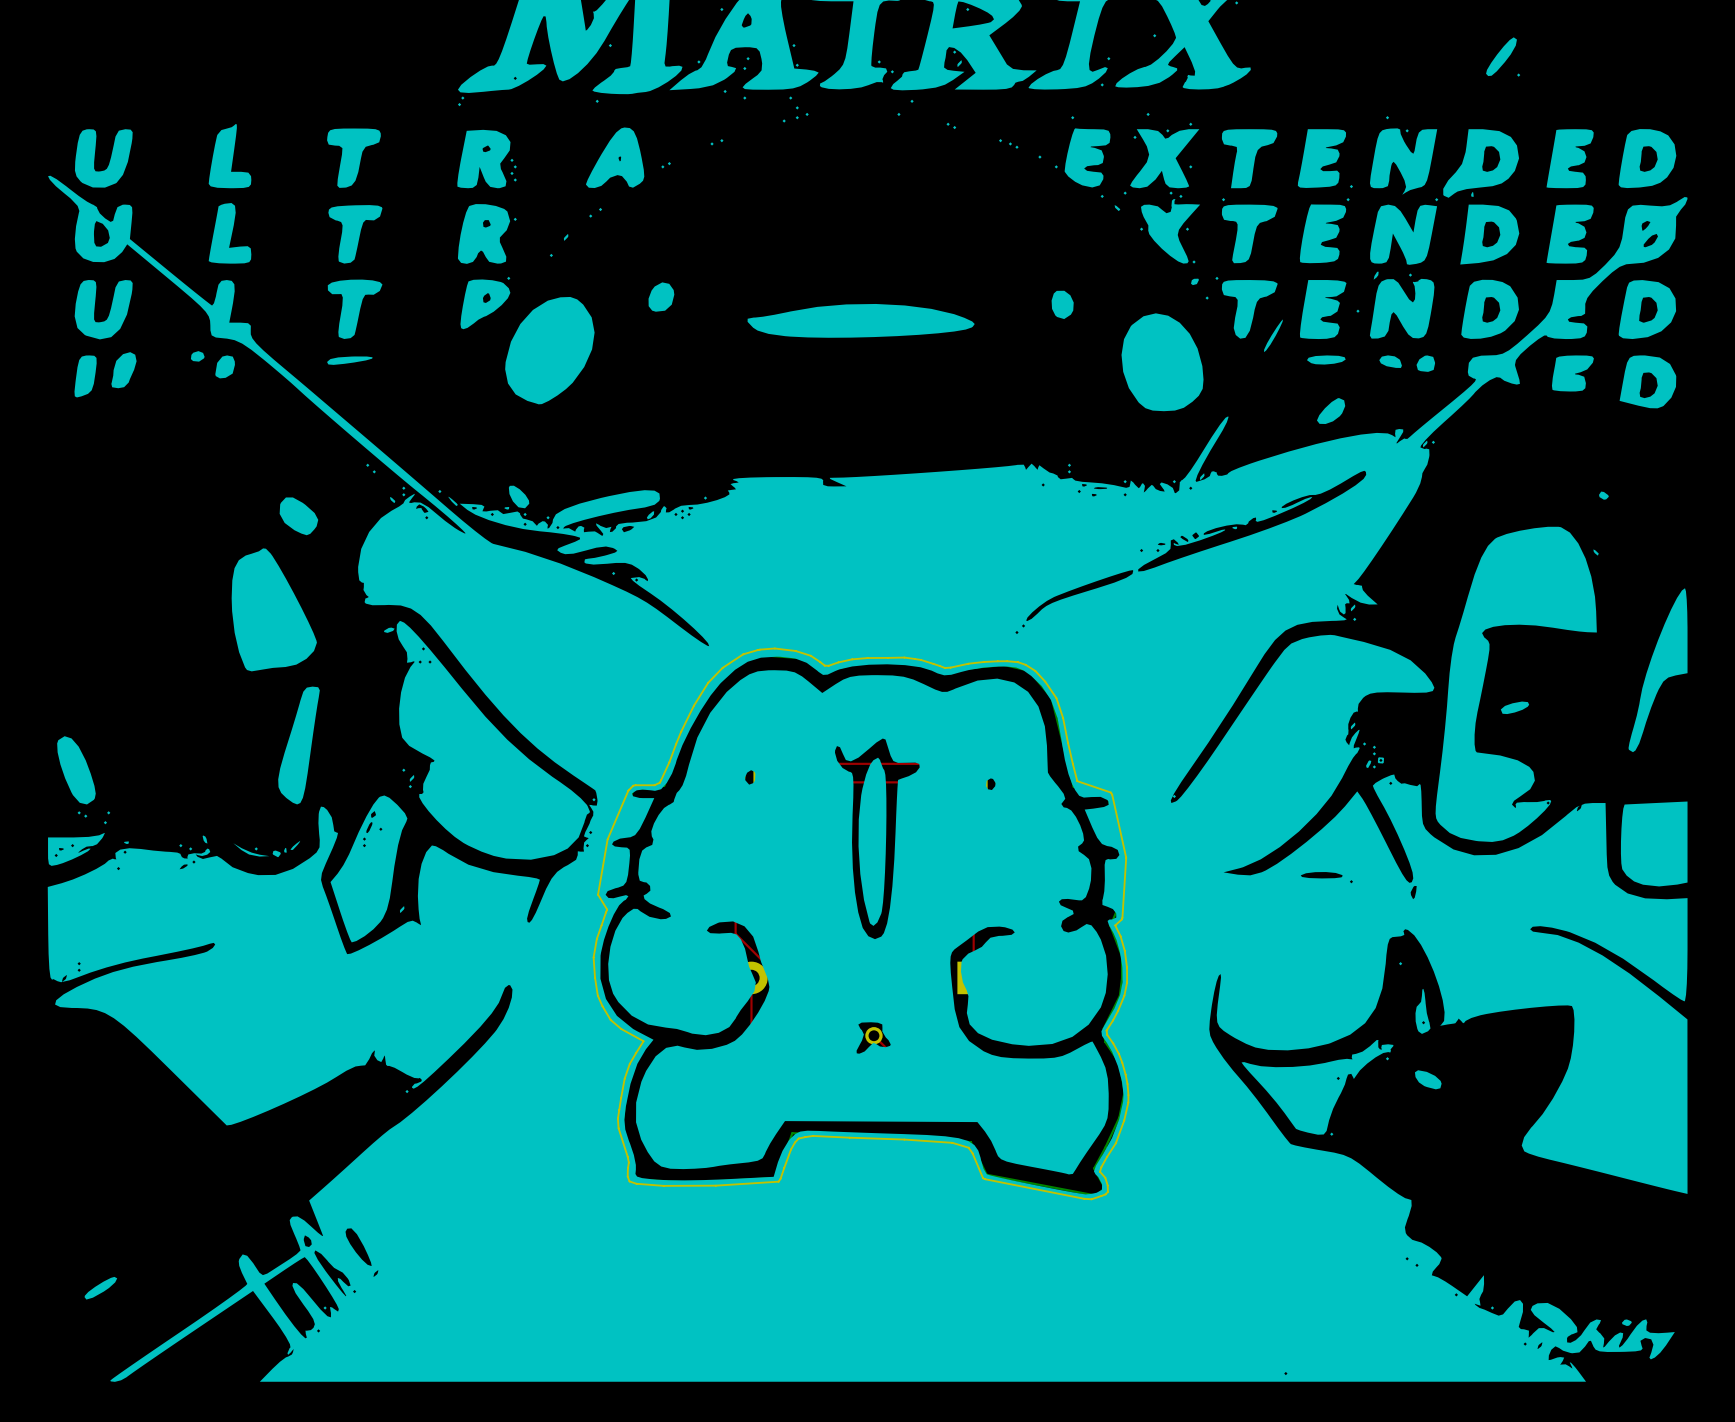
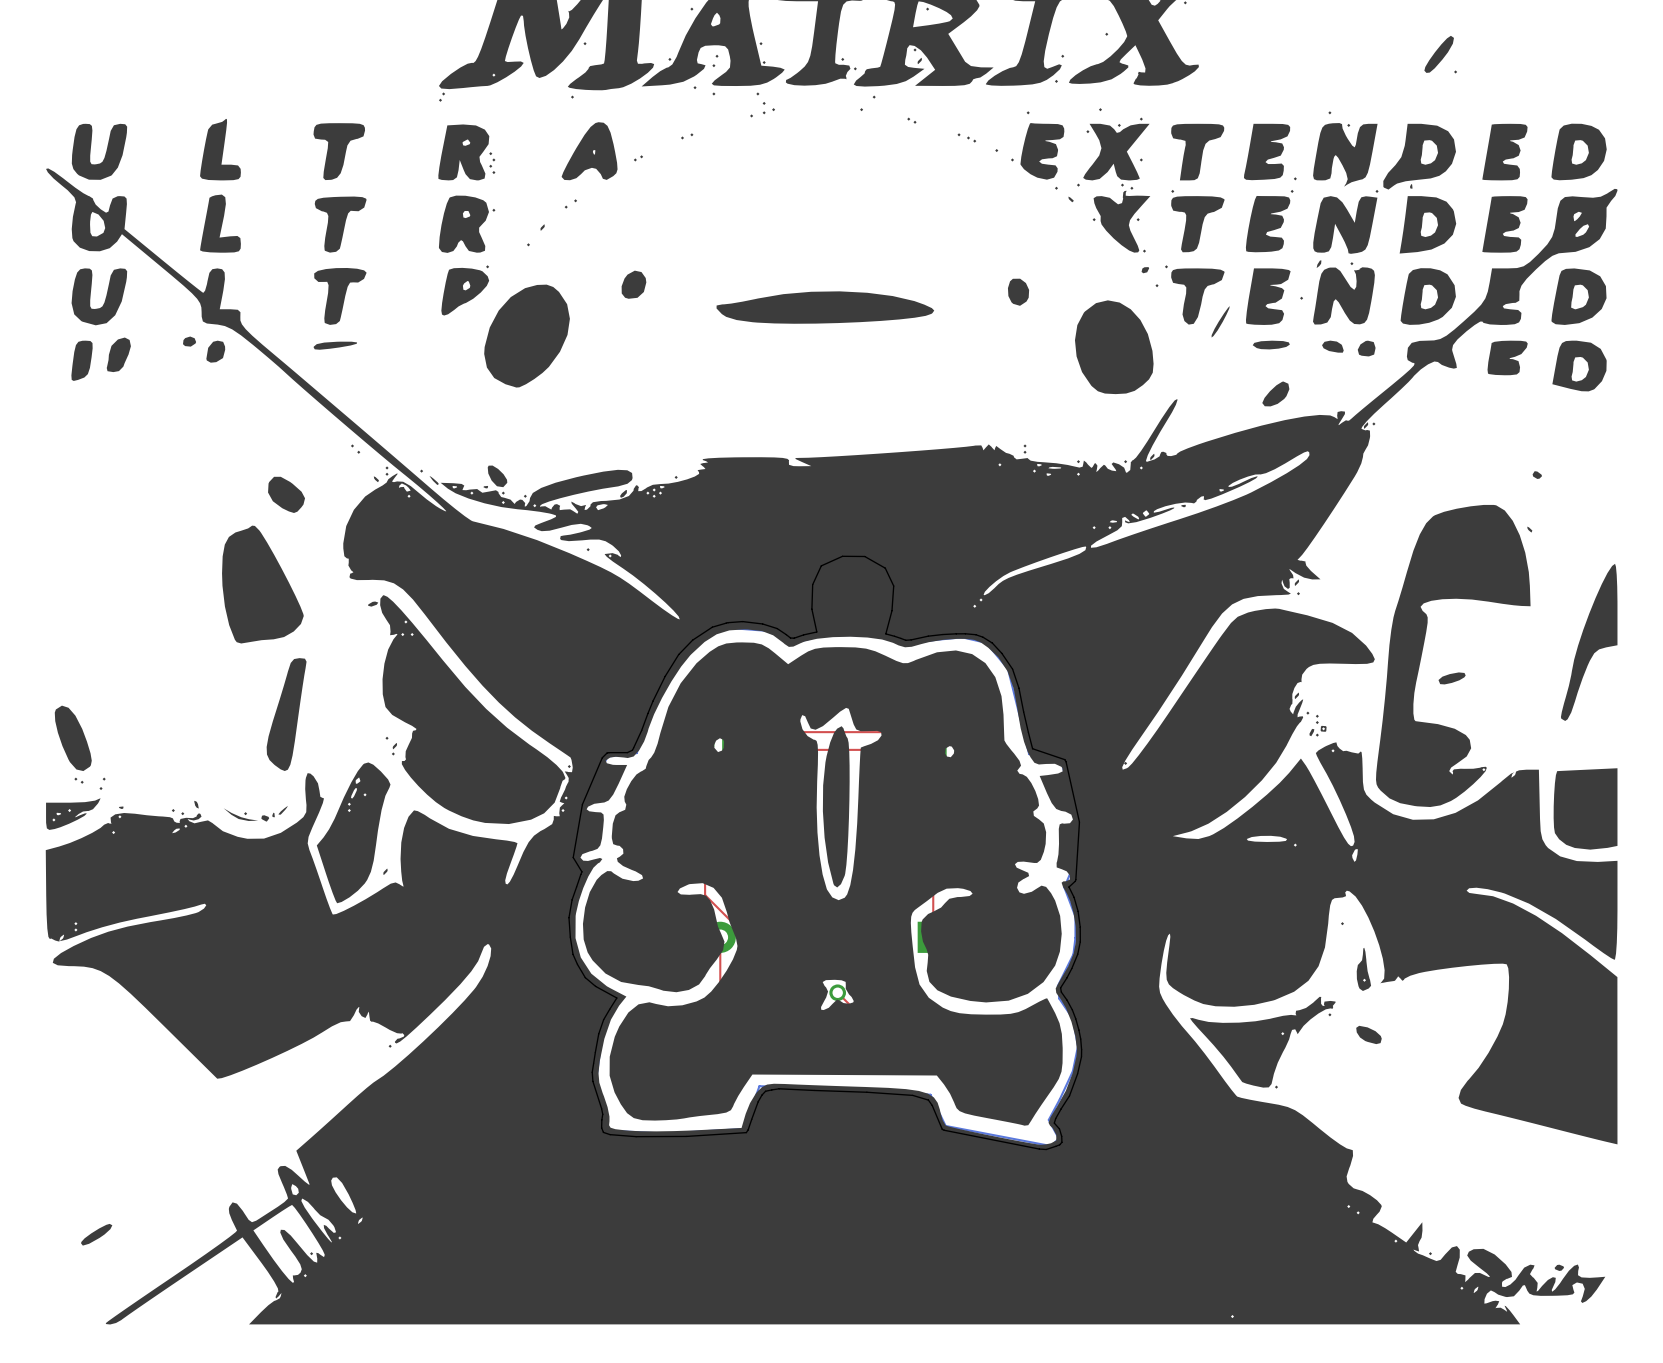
board edge: (852, 659) (904, 657) (933, 663) -> (816, 631) (811, 609) (812, 584) (821, 565) (842, 556) (864, 556) (885, 568) (893, 586) (891, 610) (885, 633) (894, 636)

